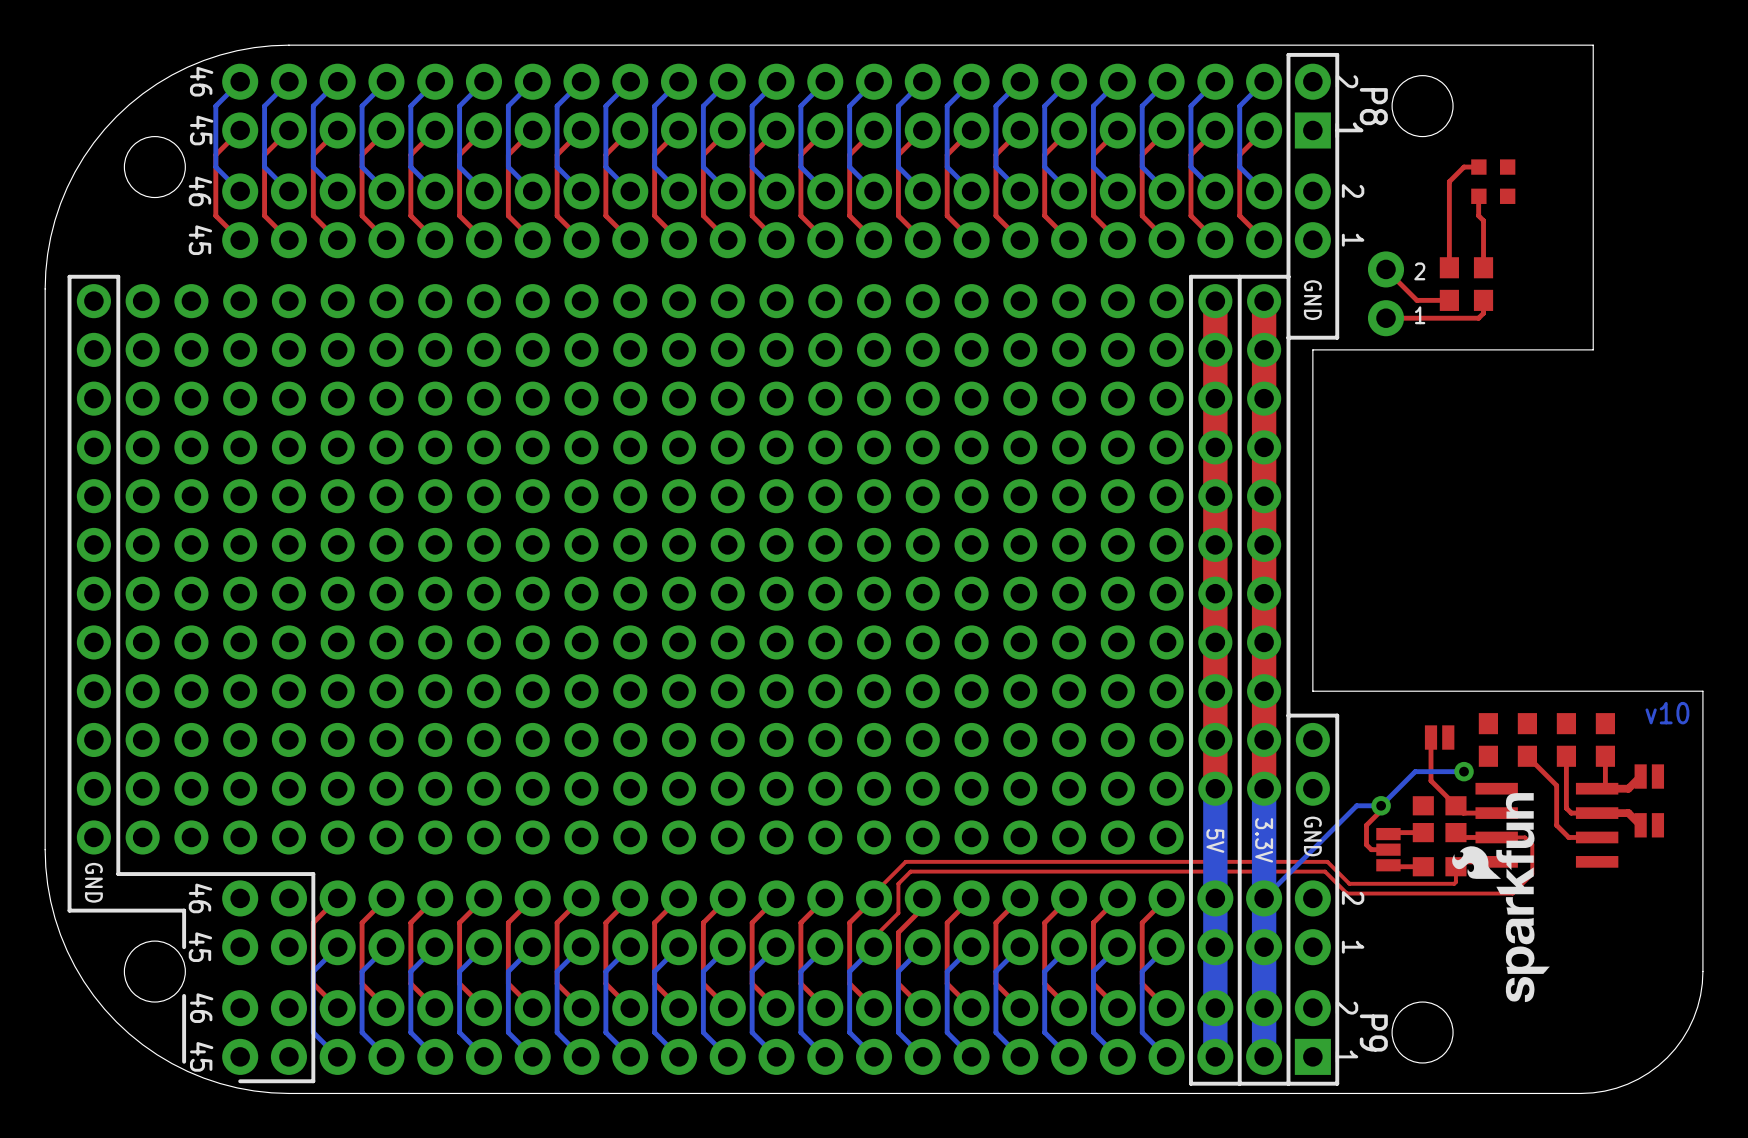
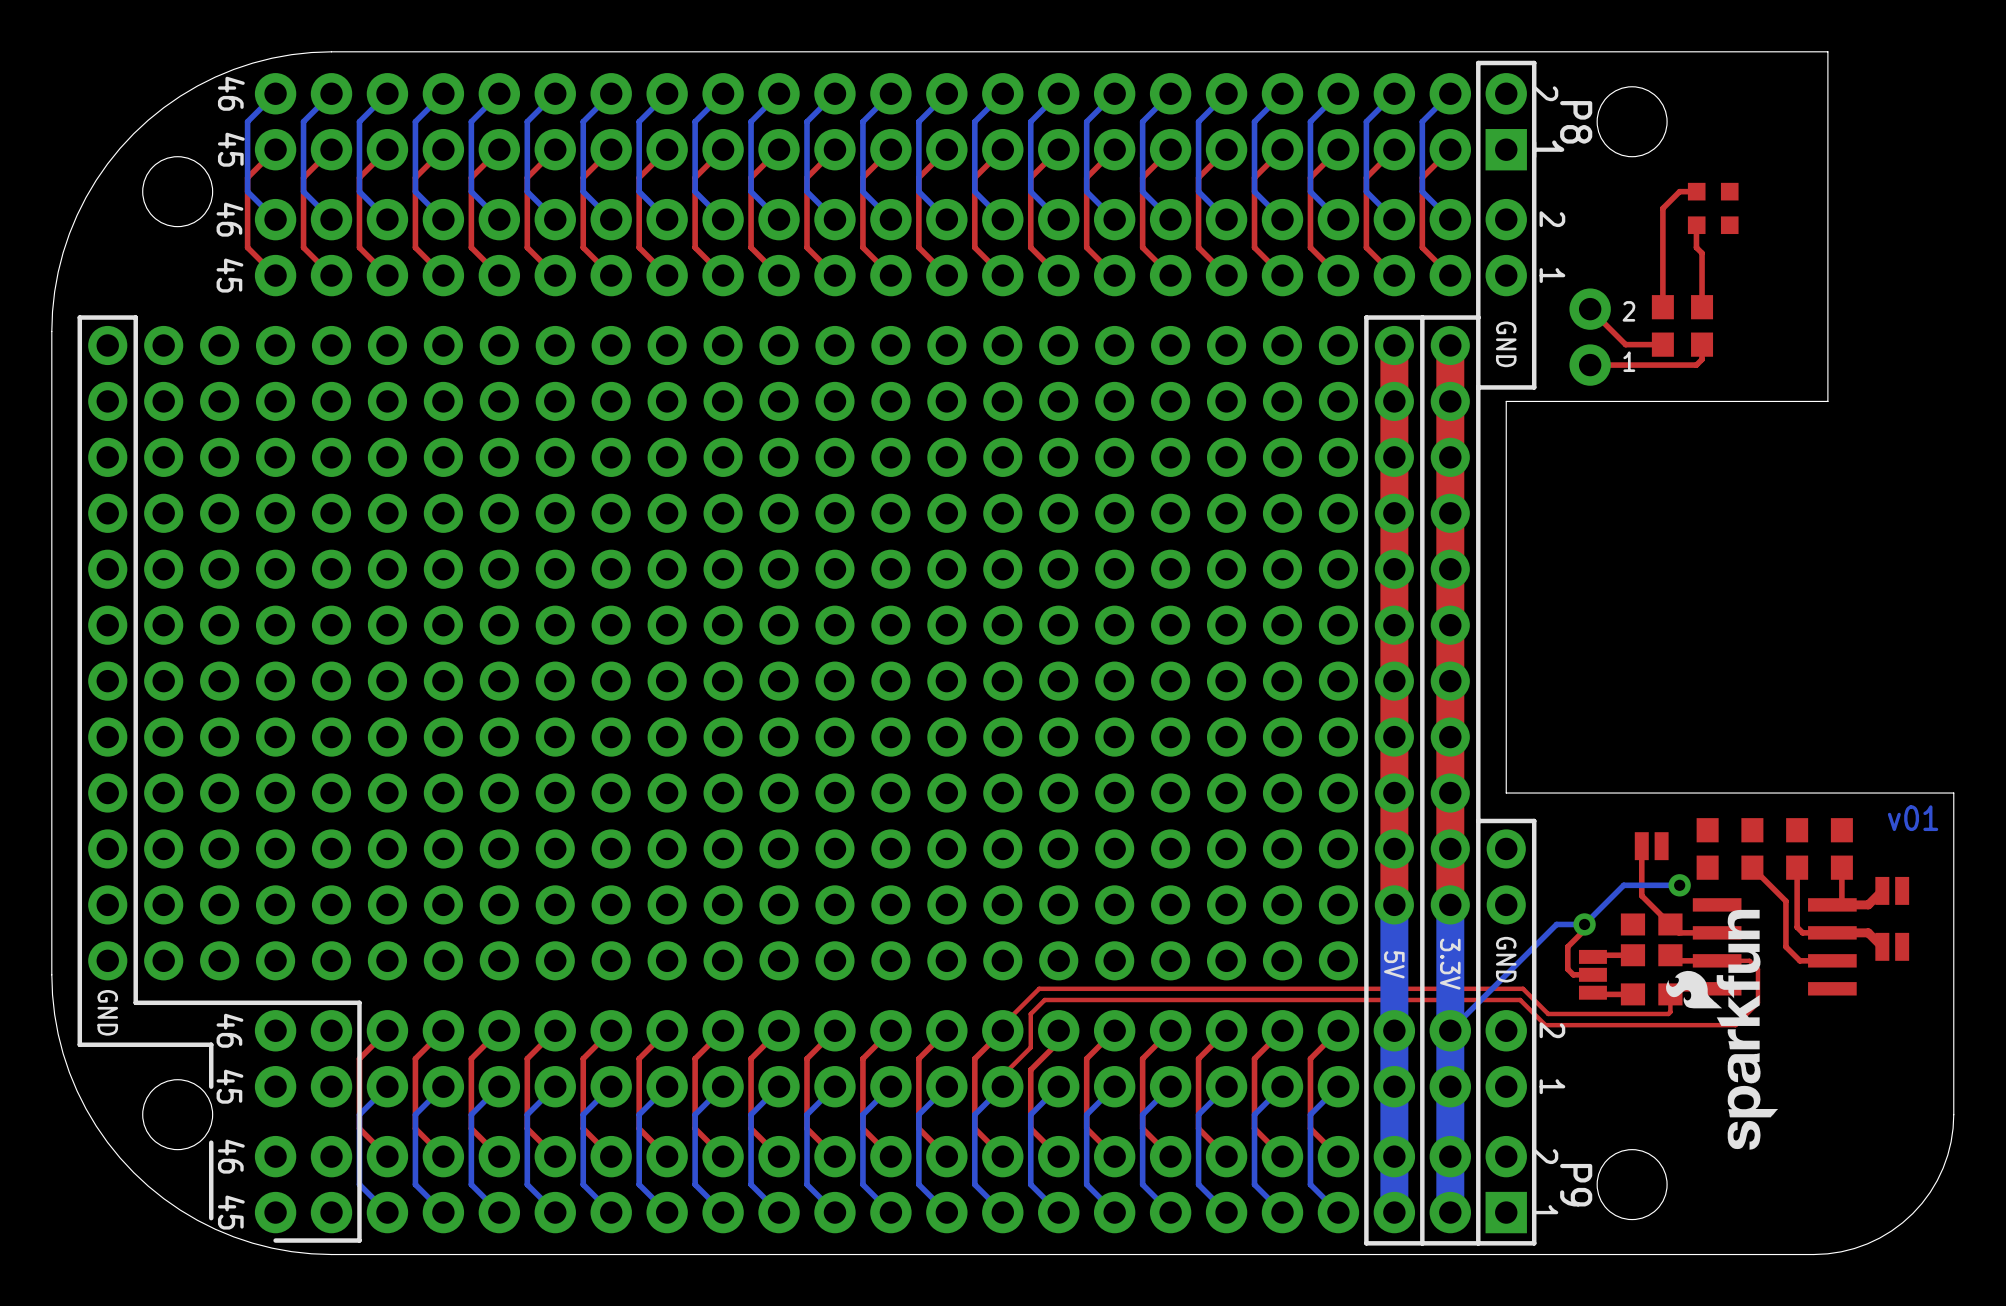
text: v10 (1667, 713) -> v01 (1913, 818)

